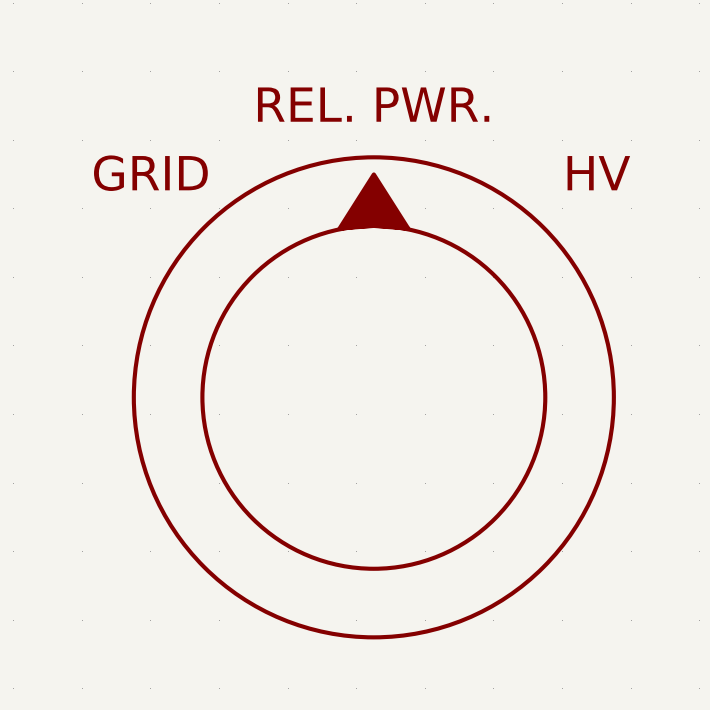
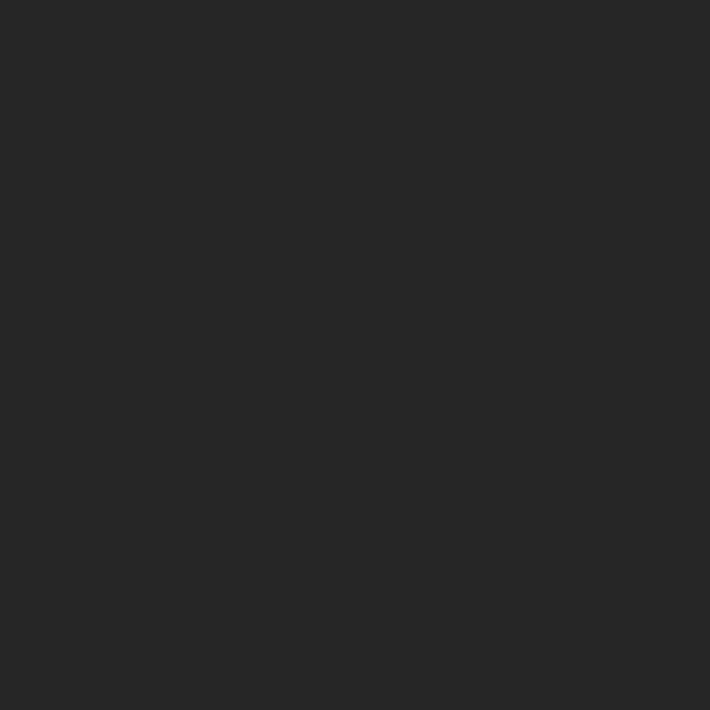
part: (373, 397) -> none

